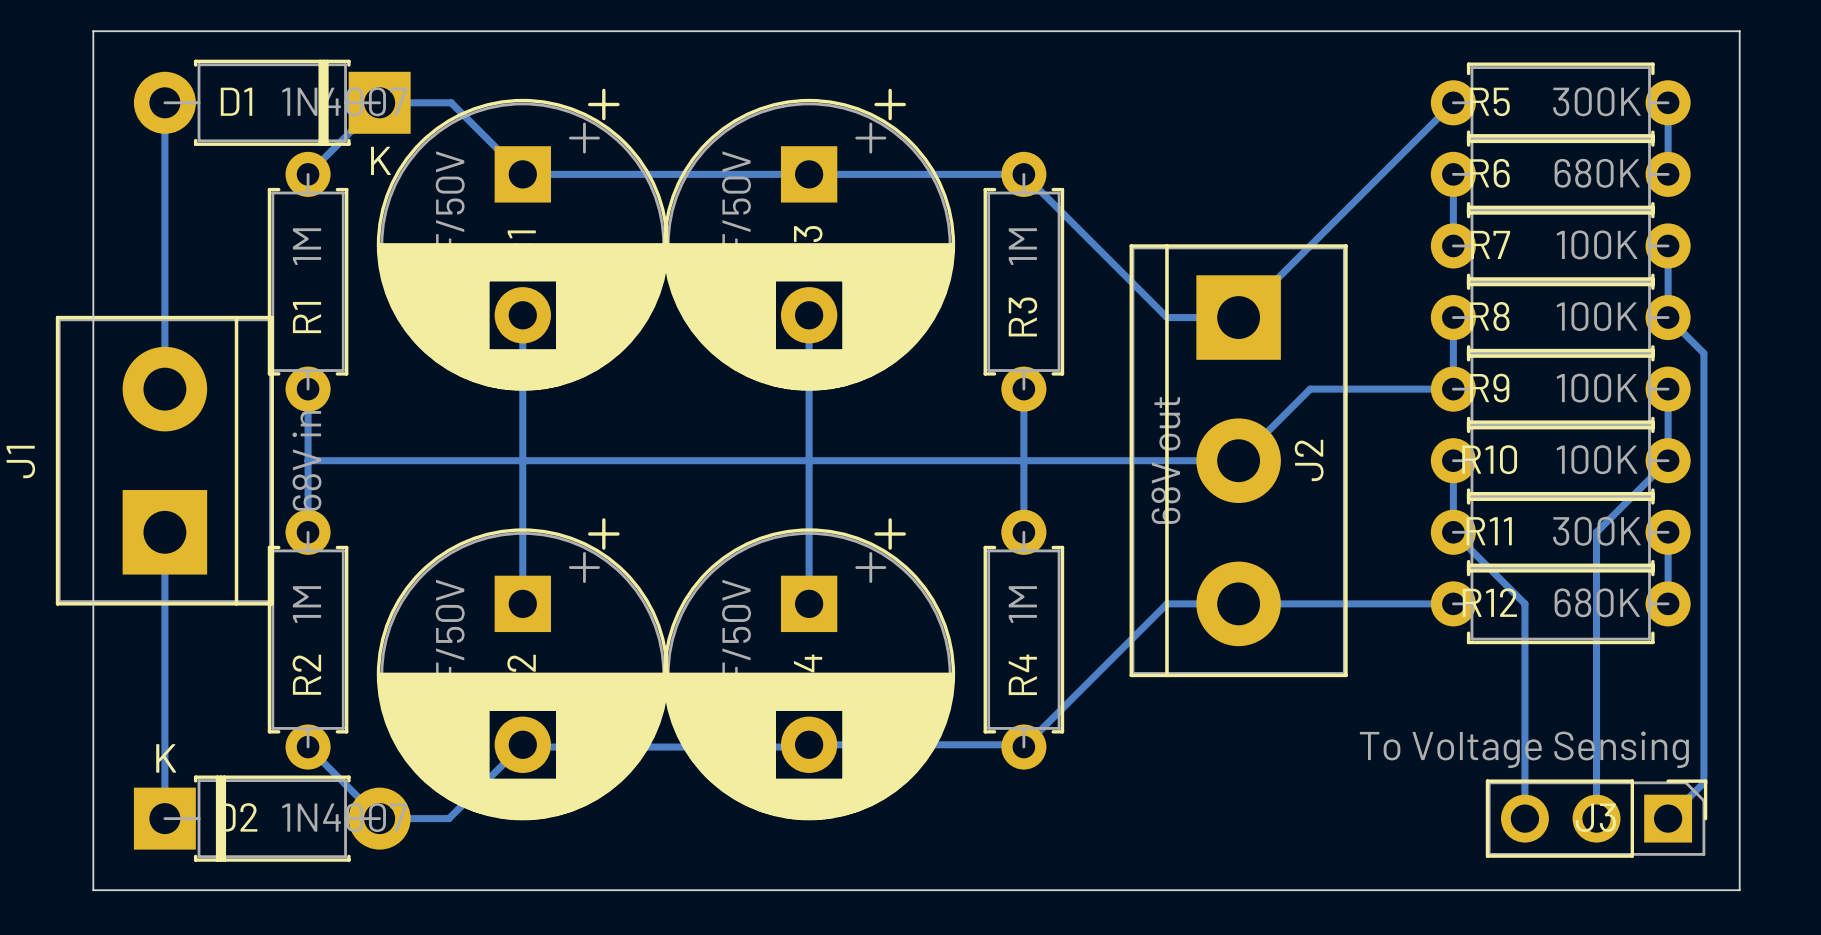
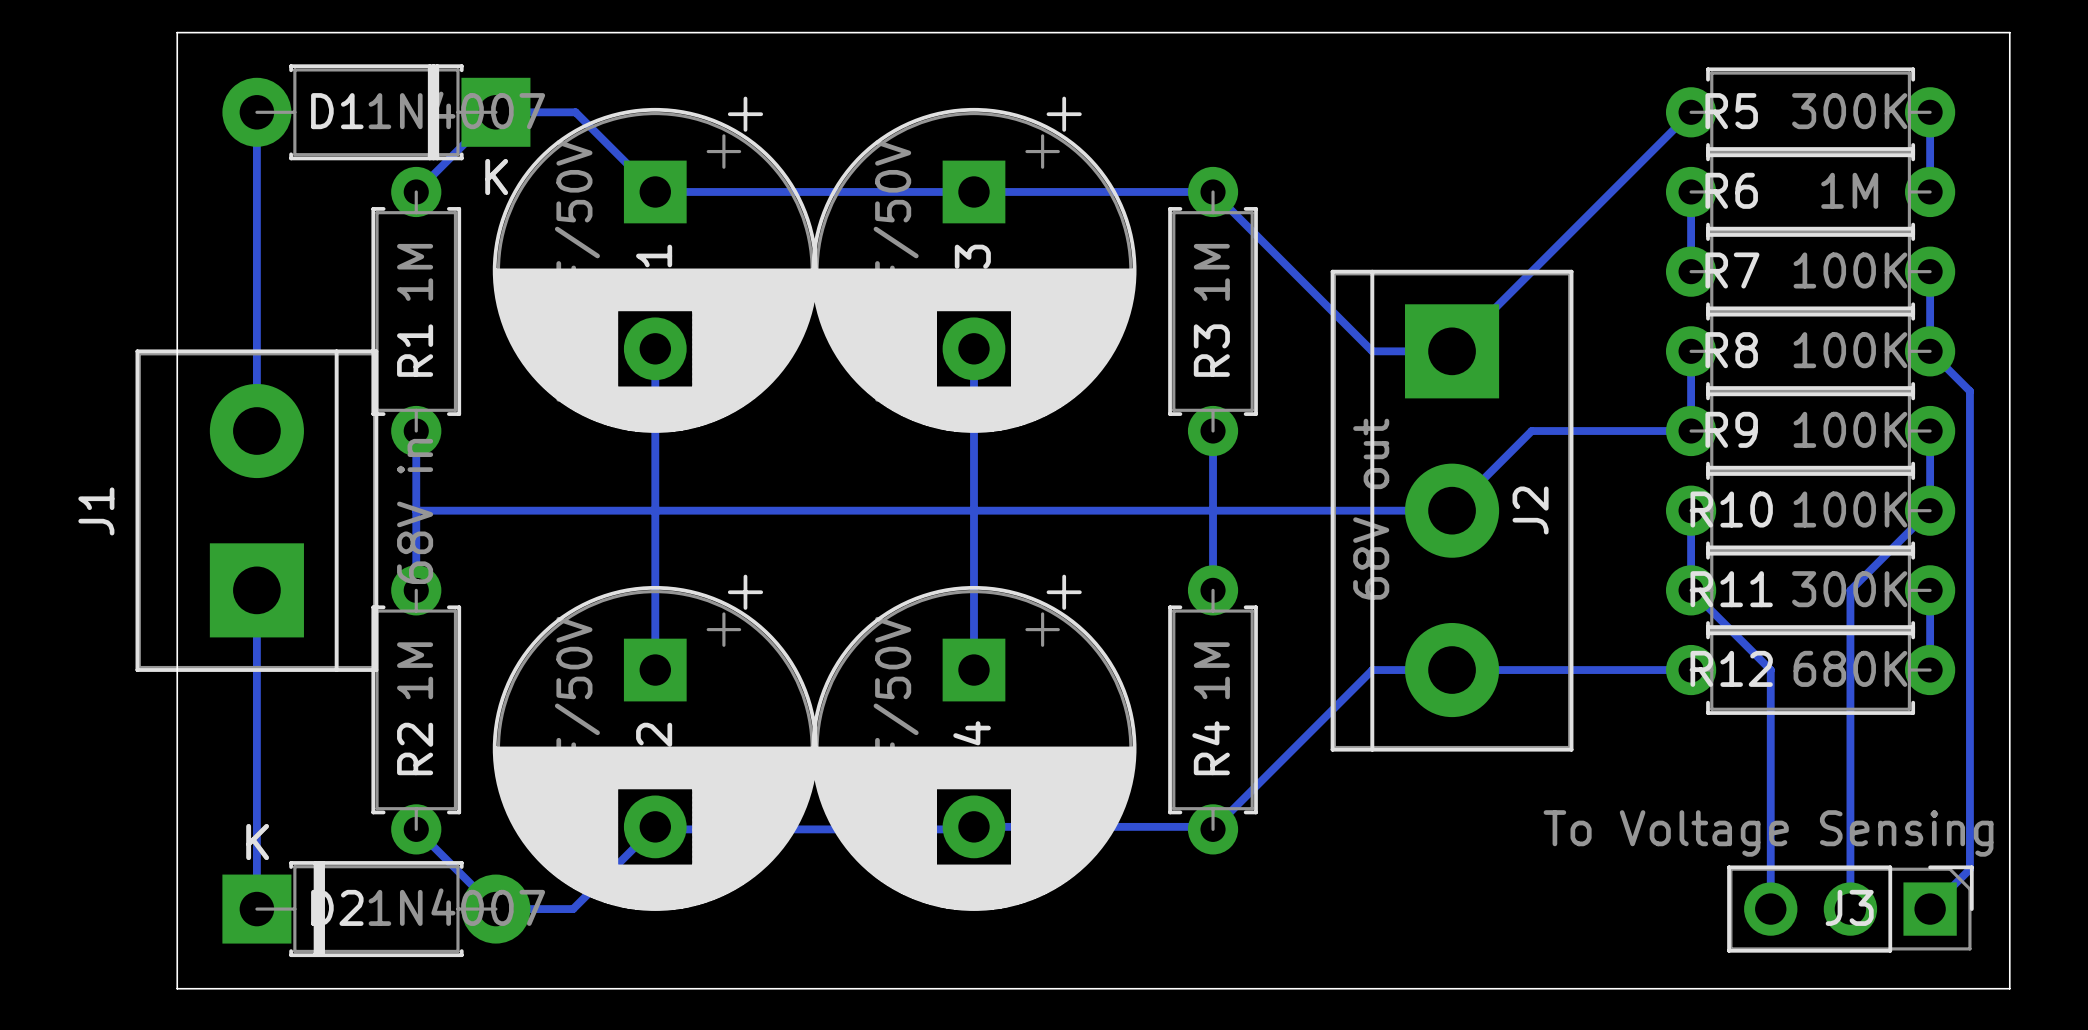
R5 value: 680K (1597, 173) -> 1M (1849, 190)

